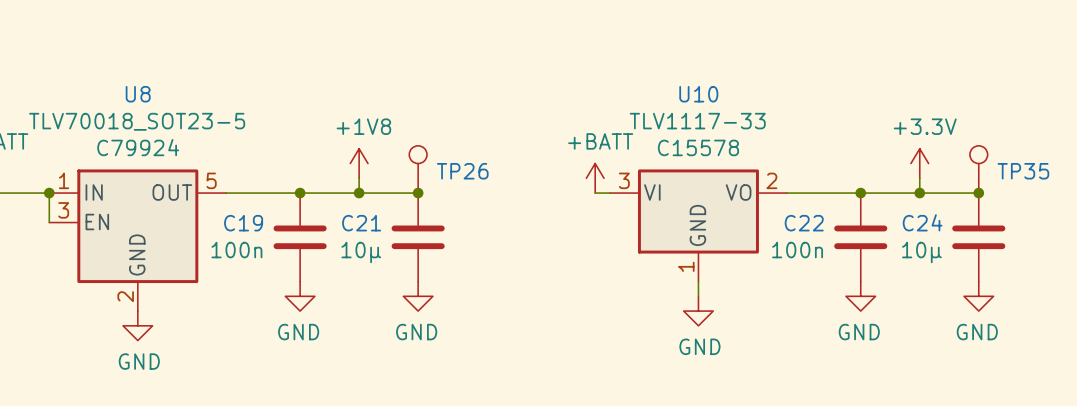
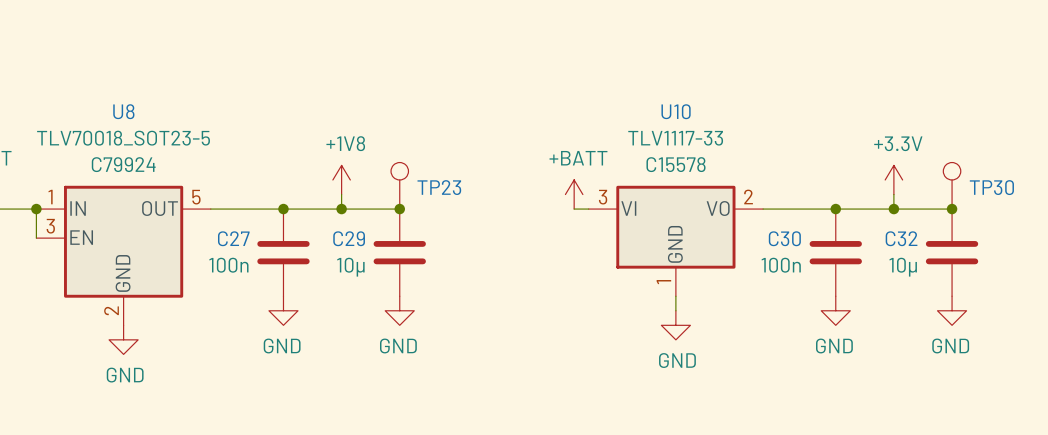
TP26 name: TP26 (462, 171) -> TP23 (439, 187)
TP35 name: TP35 (1023, 171) -> TP30 (991, 187)
C24 name: C24 (922, 222) -> C32 (901, 238)
C19 name: C19 (243, 223) -> C27 (233, 238)
C21 name: C21 (361, 223) -> C29 (349, 238)
C22 name: C22 (804, 223) -> C30 (784, 238)

